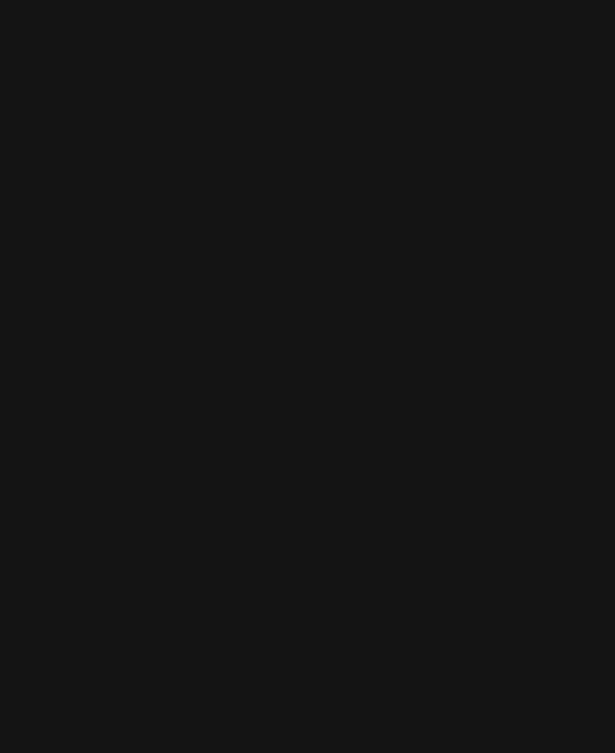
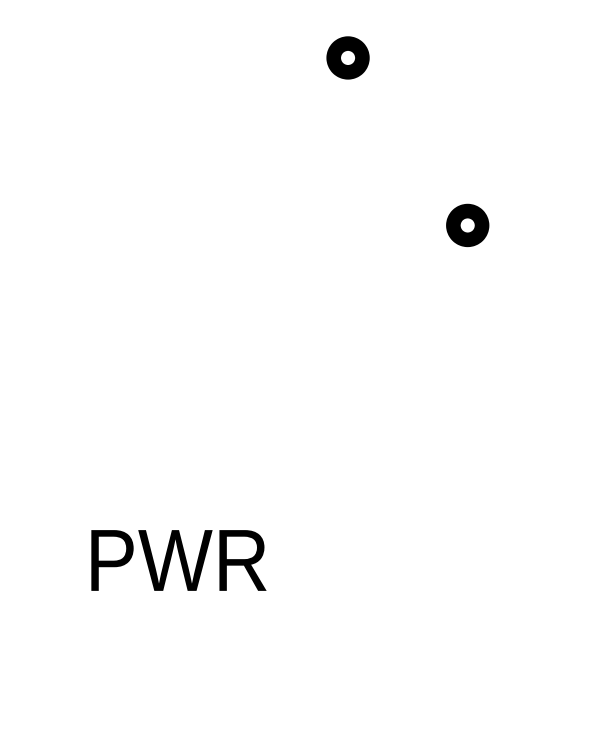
drawing: none -> [326, 36, 370, 80]
drawing: none -> [446, 203, 490, 248]
text: none -> PWR (179, 560)

